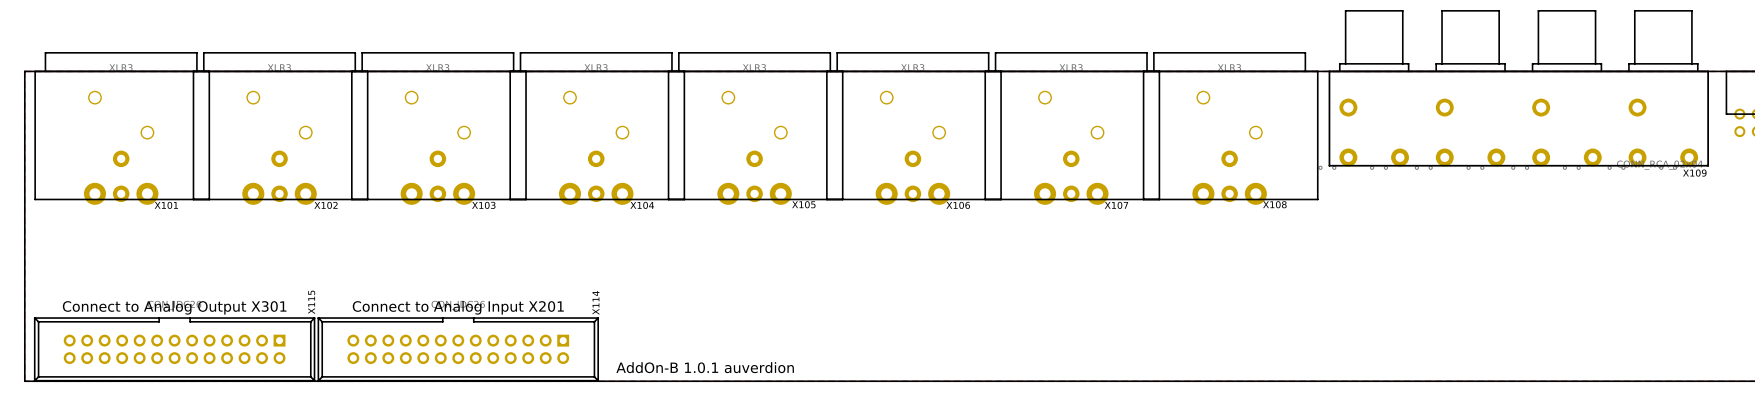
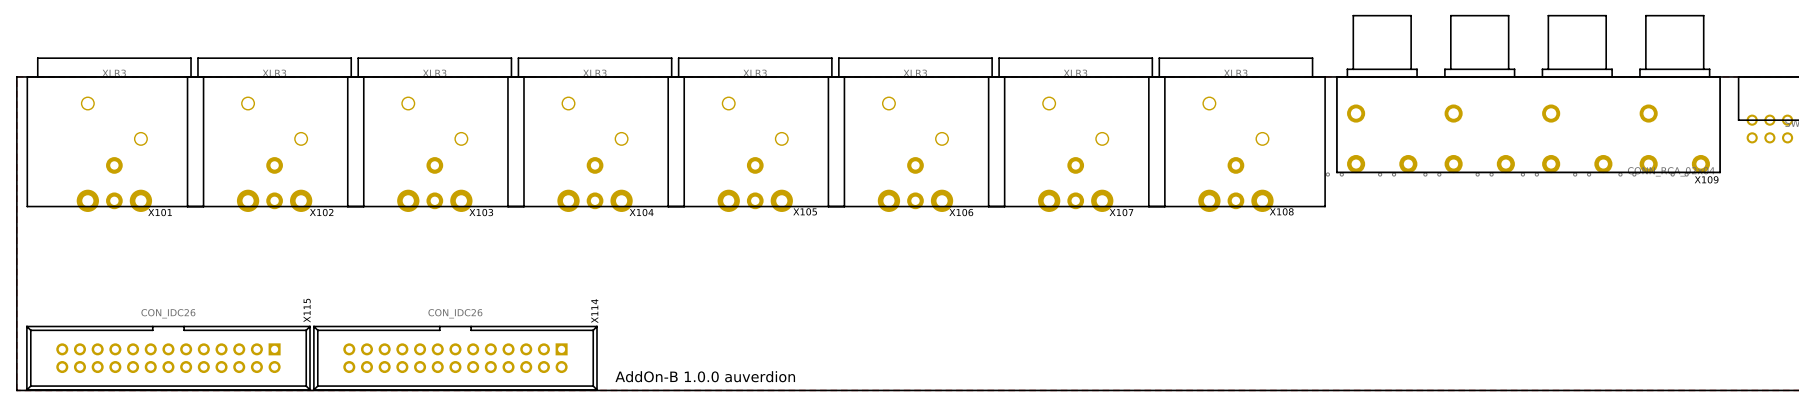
text: Connect to Analog Output X301 (174, 307) -> none
text: Connect to Analog Input X201 (458, 307) -> none
text: AddOn-B 1.0.1 auverdion (705, 367) -> AddOn-B 1.0.0 auverdion (705, 376)

